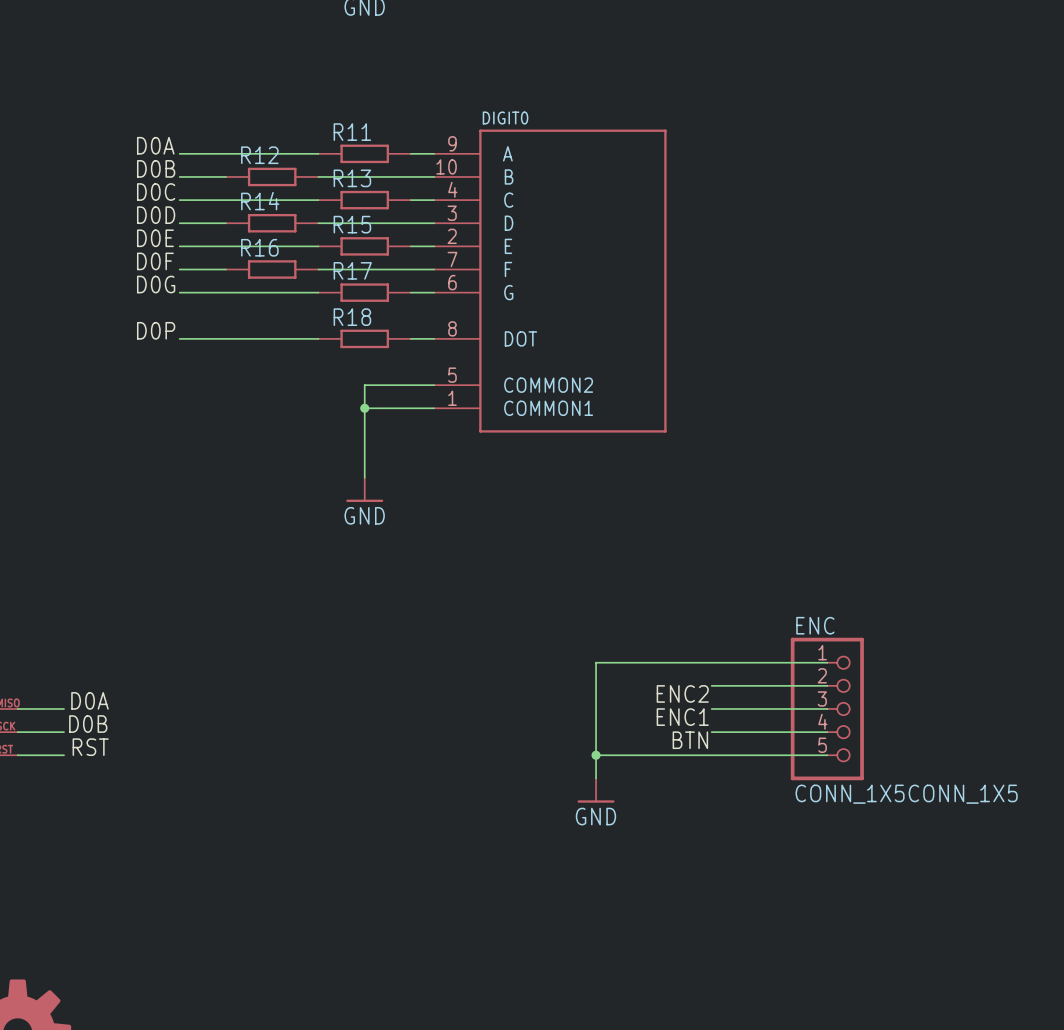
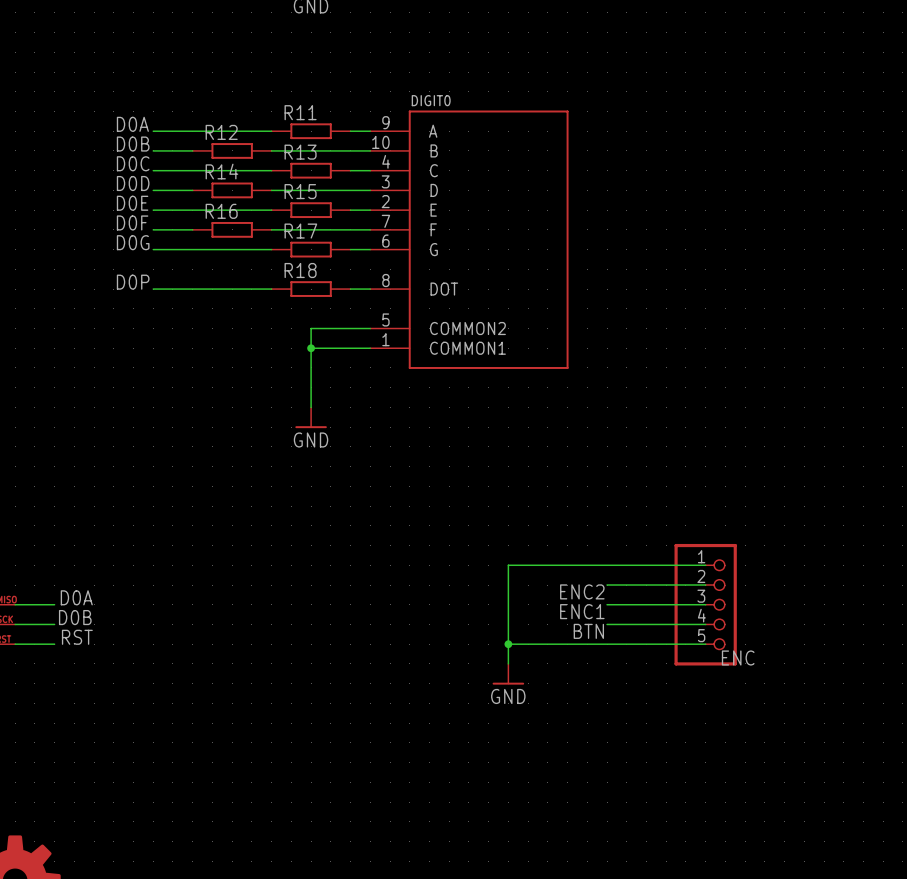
ENC name position: ENC (815, 625) -> ENC (738, 658)
ENC value: CONN_1X5CONN_1X5 (906, 794) -> none

